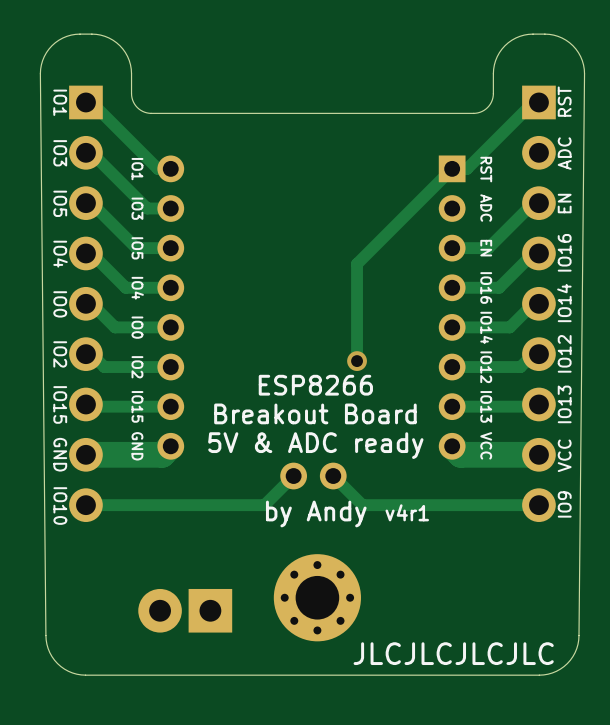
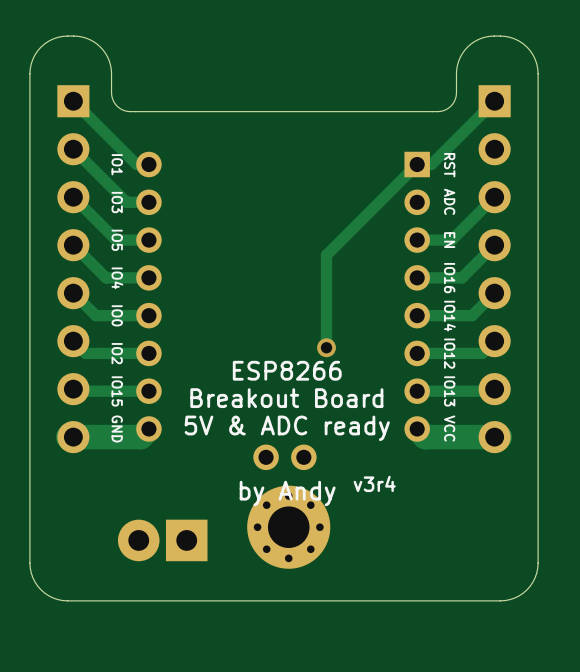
board edge: (539, 34) (553, 35) (569, 42) (580, 56) (584, 73) (578, 639) (572, 656) (564, 666) (552, 672) (539, 675) (85, 675) (64, 669) (52, 656) (45, 635) (40, 73) (44, 56) (55, 42) (71, 35) (85, 34) -> (500, 36) (514, 38) (527, 47) (535, 59) (538, 73) (537, 568) (535, 577) (527, 589) (514, 598) (500, 600) (67, 600) (48, 595) (37, 586) (32, 577) (29, 563) (29, 73) (32, 59) (41, 47) (53, 38) (67, 36)
text: RST (564, 101) -> none
text: IO1 (60, 102) -> none
text: IO3 (60, 153) -> none
text: ADC (564, 153) -> none
text: IO5 (60, 203) -> none
text: EN (564, 203) -> none
text: IO16 (564, 252) -> none
text: IO4 (60, 254) -> none
part: none -> (73, 269)
part: none -> (494, 269)
part: (85, 303) -> none
part: (538, 303) -> none
text: IO14 (564, 303) -> none
text: IO0 (60, 304) -> none
text: IO12 (564, 353) -> none
text: IO2 (60, 354) -> none
text: IO15 (60, 404) -> none
text: IO13 (564, 404) -> none
text: GND (60, 454) -> none
text: VCC (564, 455) -> none
track: (293, 476) (264, 505) (85, 505) -> none
track: (333, 476) (362, 505) (538, 505) -> none
text: IO9 (564, 504) -> none
text: IO10 (60, 506) -> none
text: v4r1 (407, 512) -> v3r4 (374, 483)
part position: (317, 597) -> (288, 527)
part position: (185, 610) -> (162, 540)
text: JLCJLCJLCJLC (453, 653) -> none

